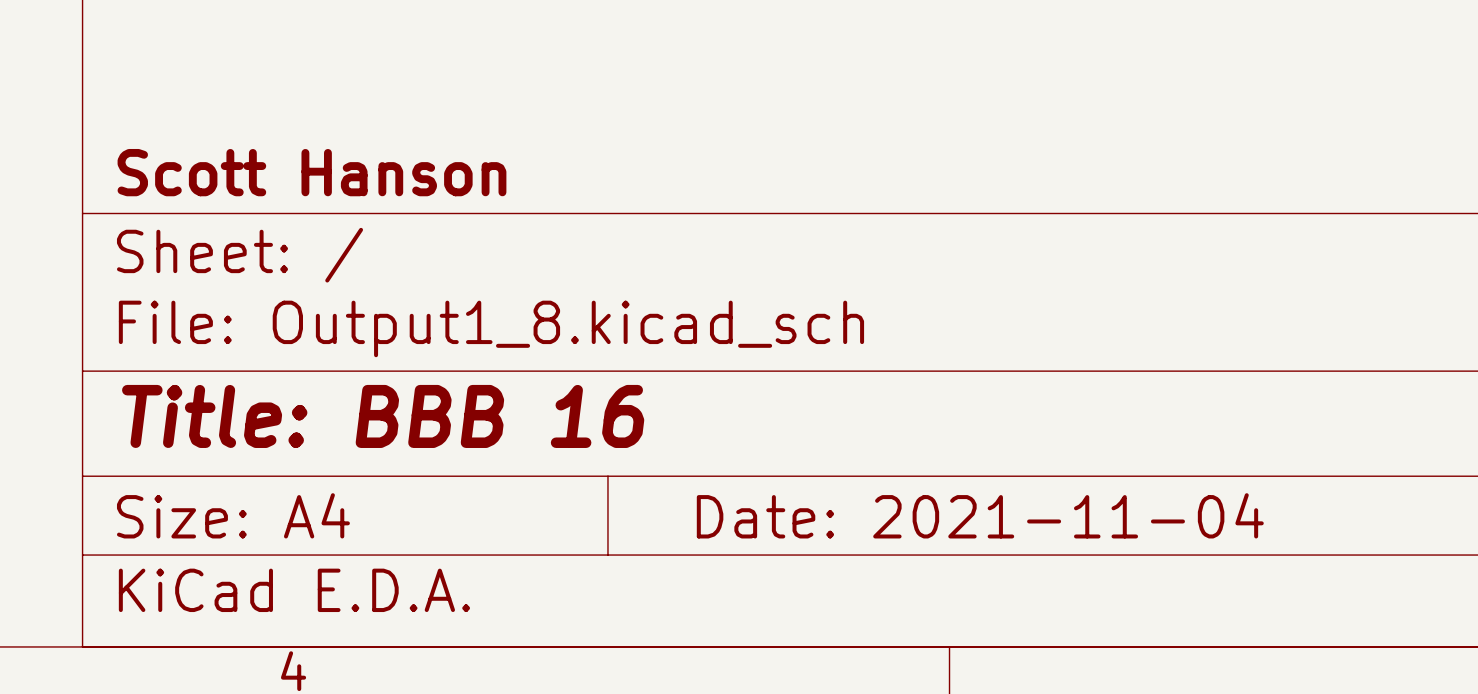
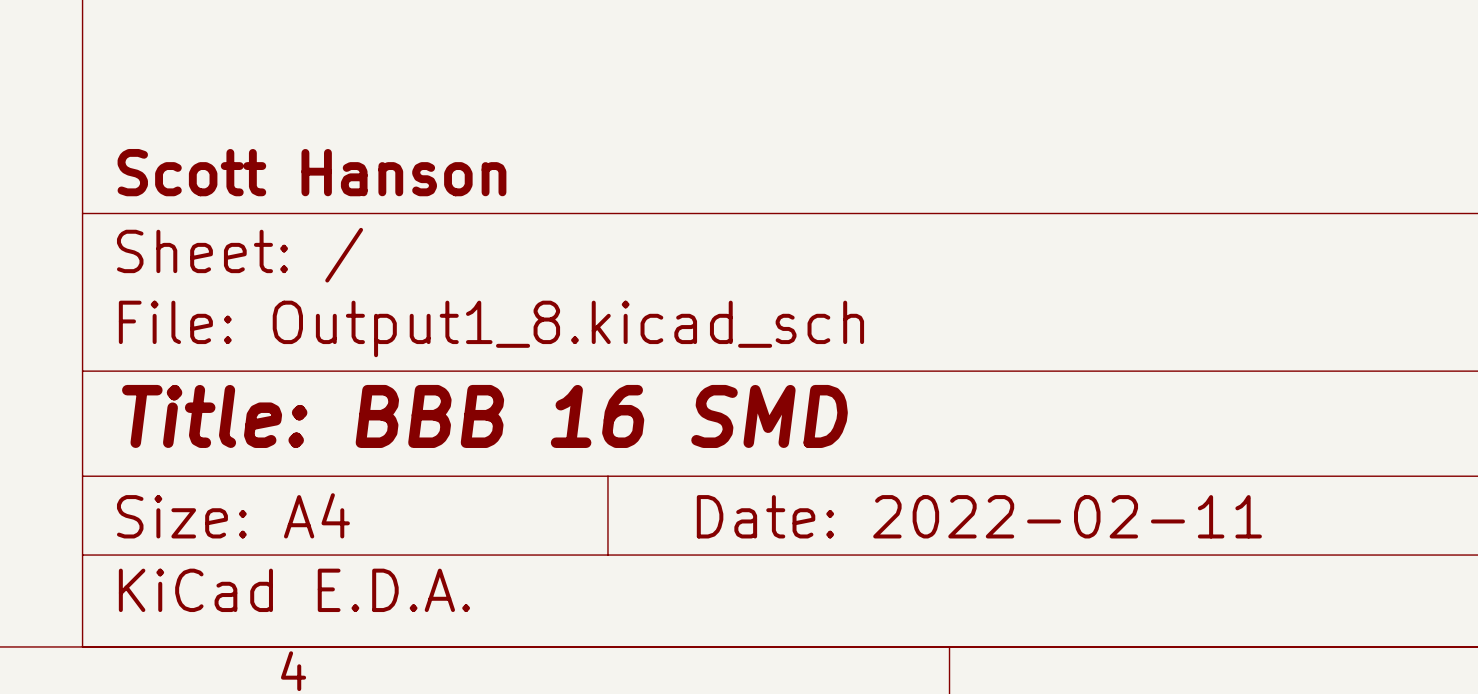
title block: Title: BBB 16 (383, 416) -> Title: BBB 16 SMD (484, 416)
title block: Date: 2021-11-04 (980, 515) -> Date: 2022-02-11 (979, 516)

